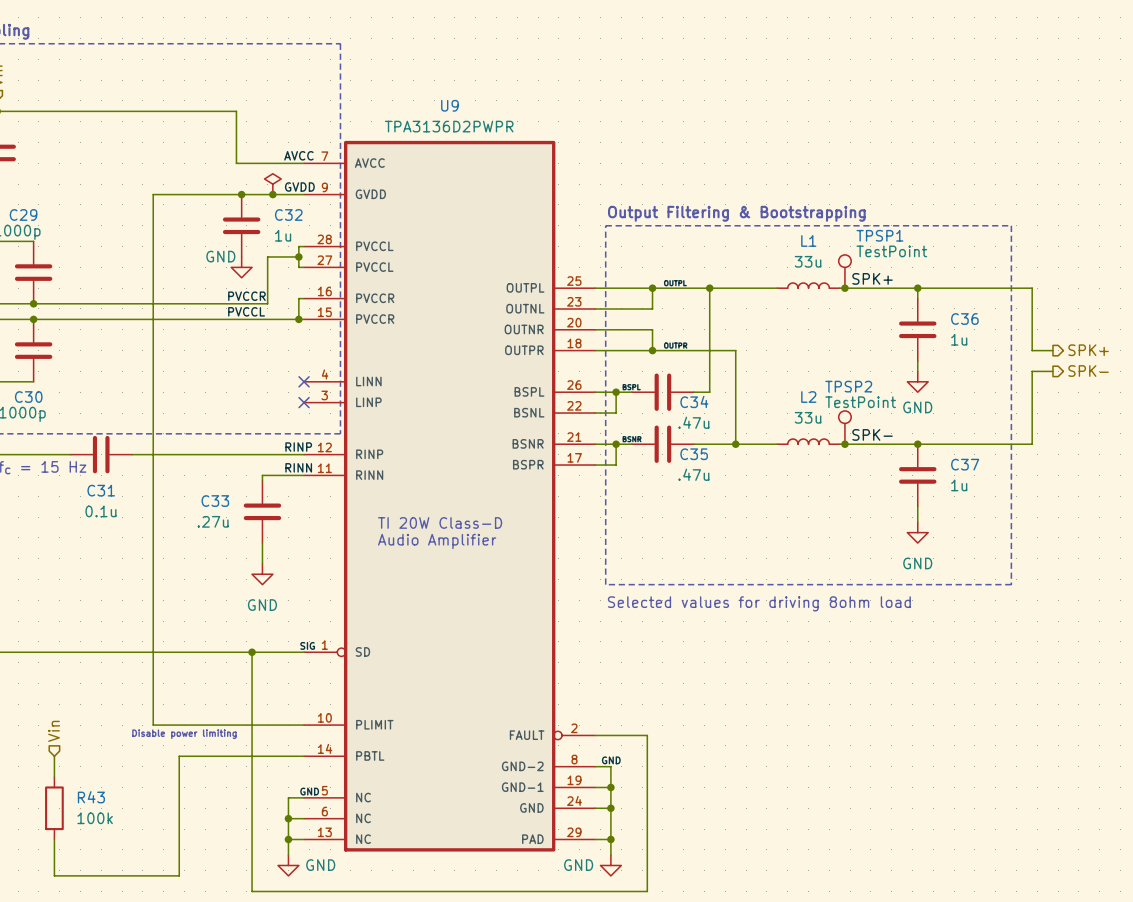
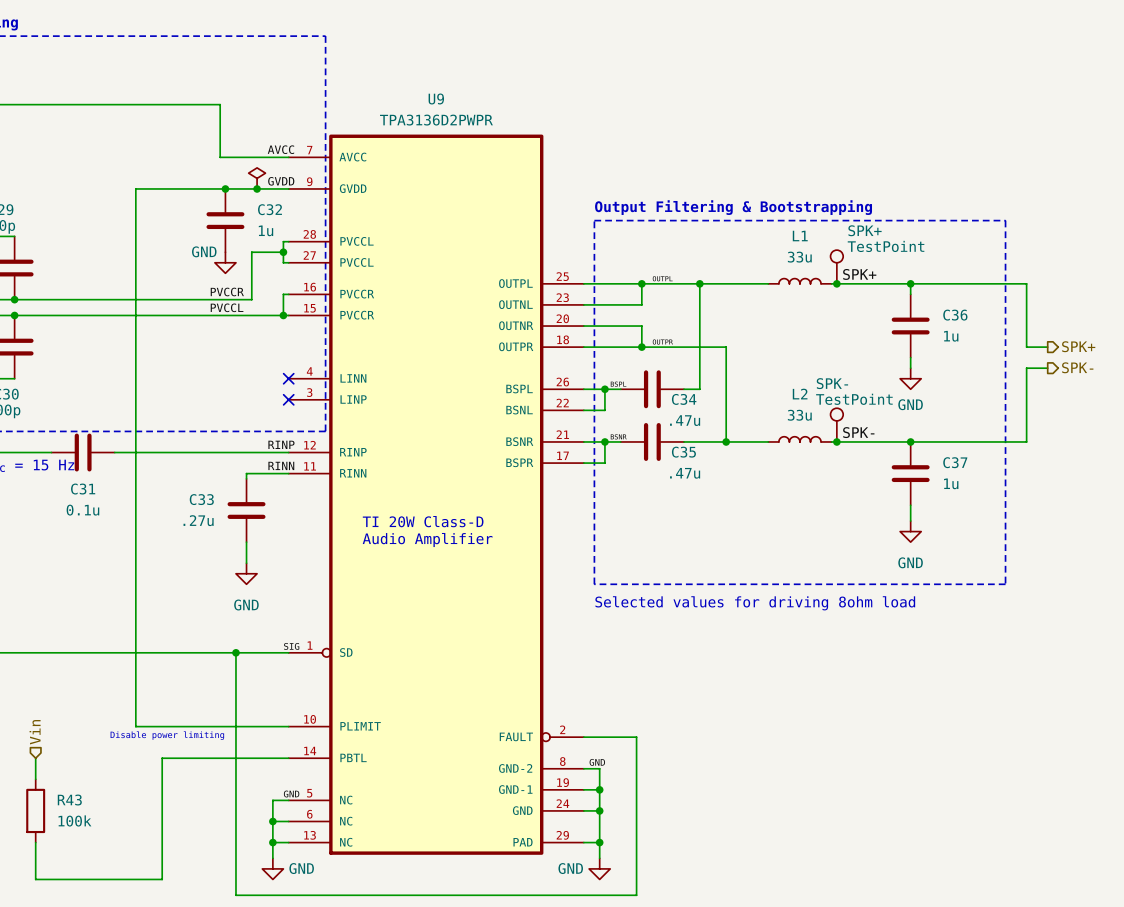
TPSP1 name: TPSP1 (879, 235) -> SPK+ (865, 230)
TPSP2 name: TPSP2 (848, 386) -> SPK- (832, 383)

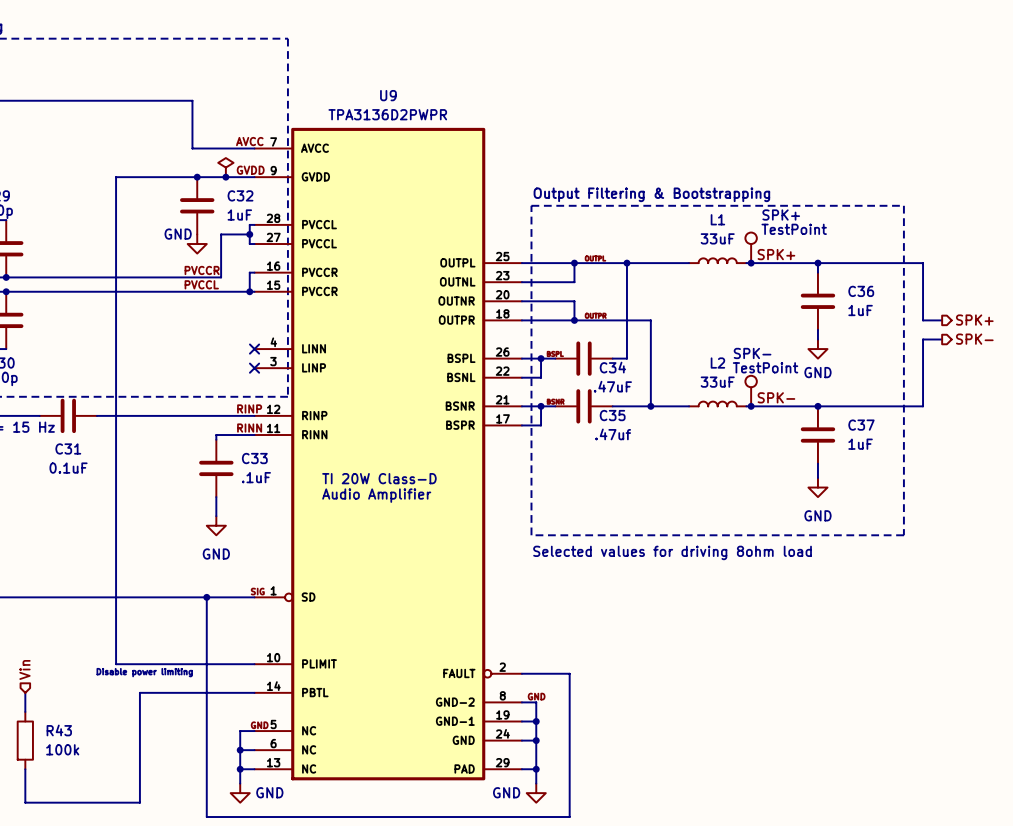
C32 value: 1u (266, 230) -> 1uF (239, 215)
L1 value: 33u (799, 257) -> 33uF (717, 238)
C36 value: 1u (951, 336) -> 1uF (860, 310)
L2 value: 33u (799, 415) -> 33uF (717, 382)
C34 value: .47u (685, 420) -> .47uF (612, 386)
C35 value: .47u (685, 473) -> .47uf (613, 434)
C37 value: 1u (951, 483) -> 1uF (860, 444)
C33 name position: C33 (201, 499) -> C33 (254, 458)
C31 value: 0.1u (82, 510) -> 0.1uF (68, 468)
C33 value: .27u (198, 520) -> .1uF (256, 477)

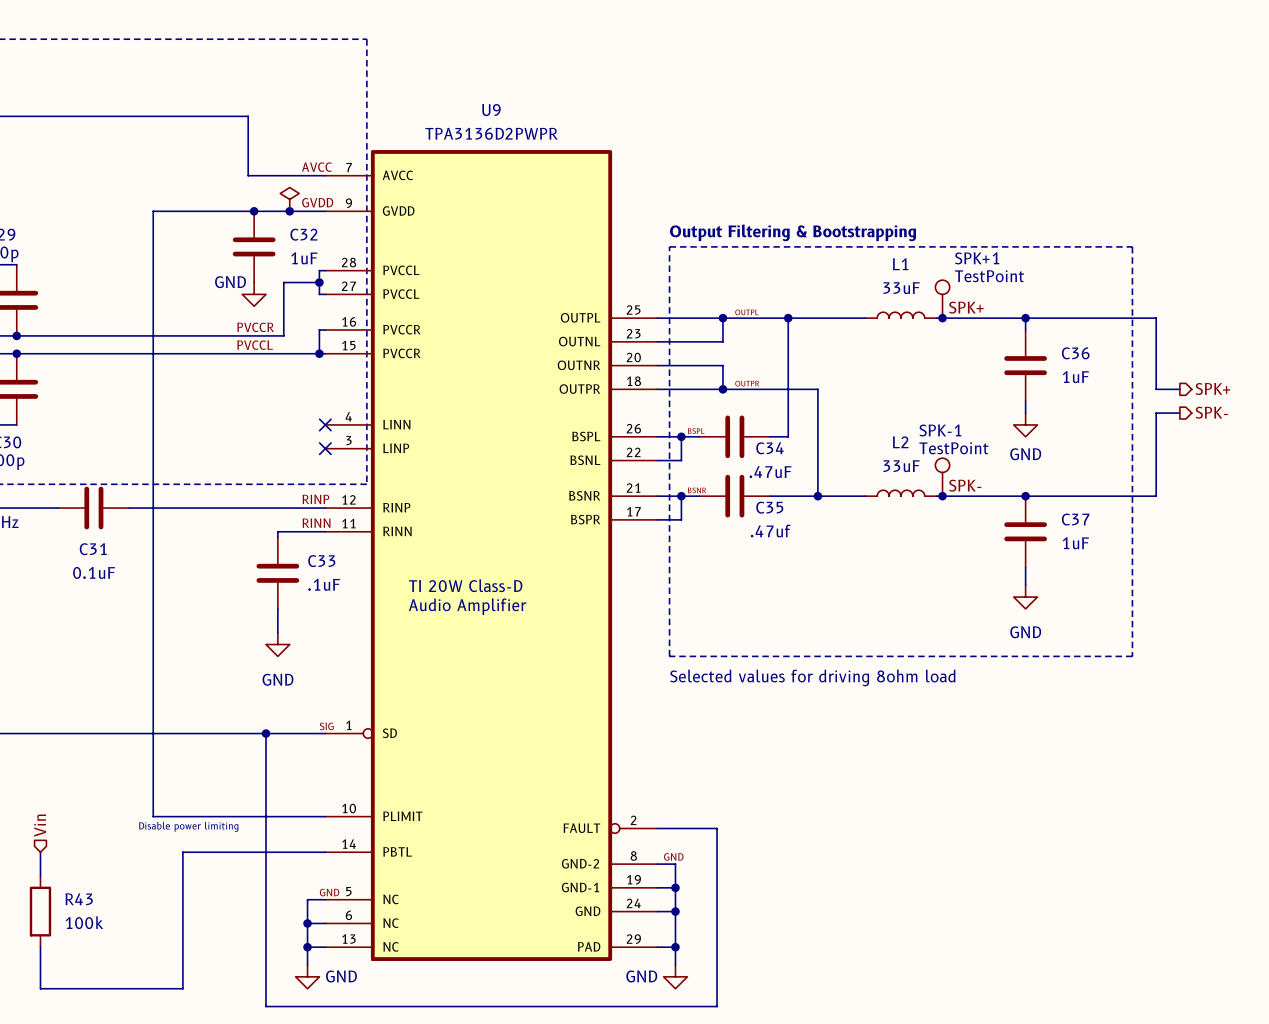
SPK+ name: SPK+ (781, 215) -> SPK+1 (977, 258)
SPK- name: SPK- (752, 353) -> SPK-1 (940, 430)

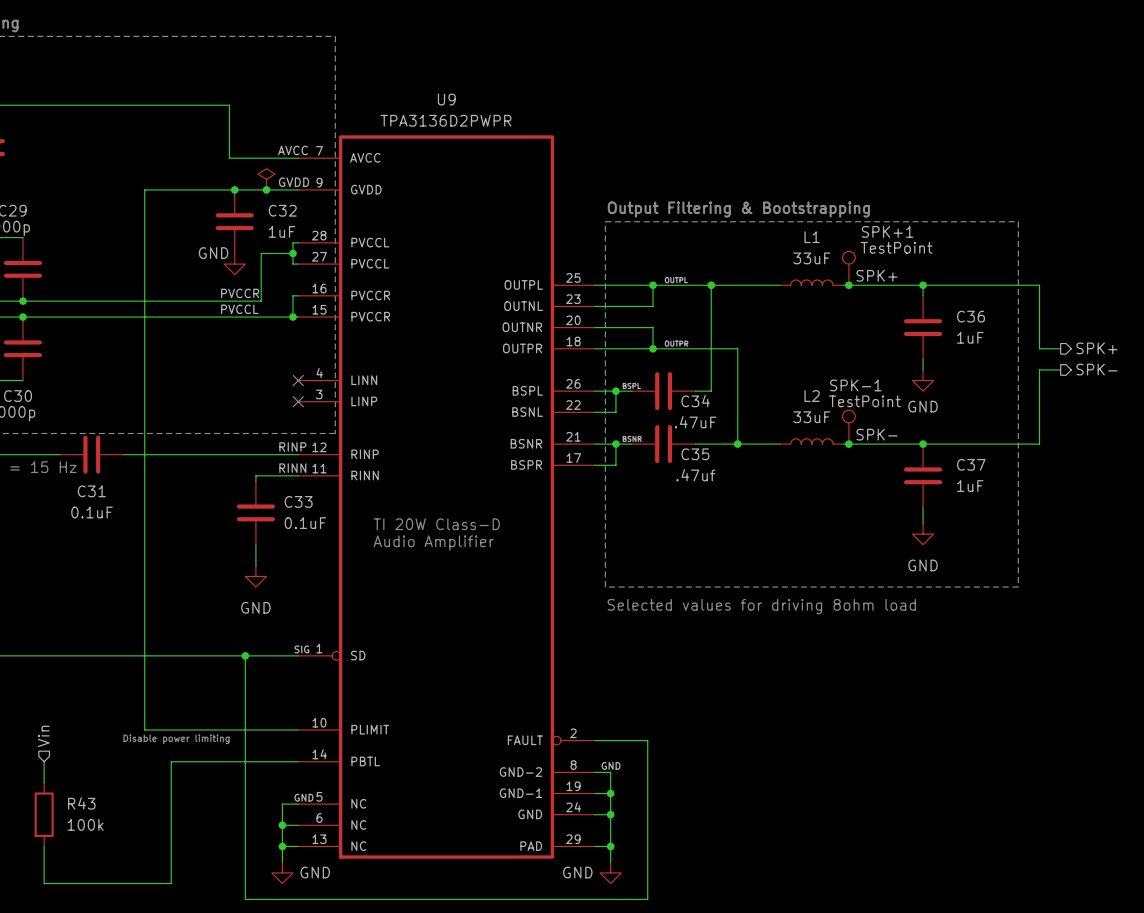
C33 value: .1uF (324, 584) -> 0.1uF (305, 523)

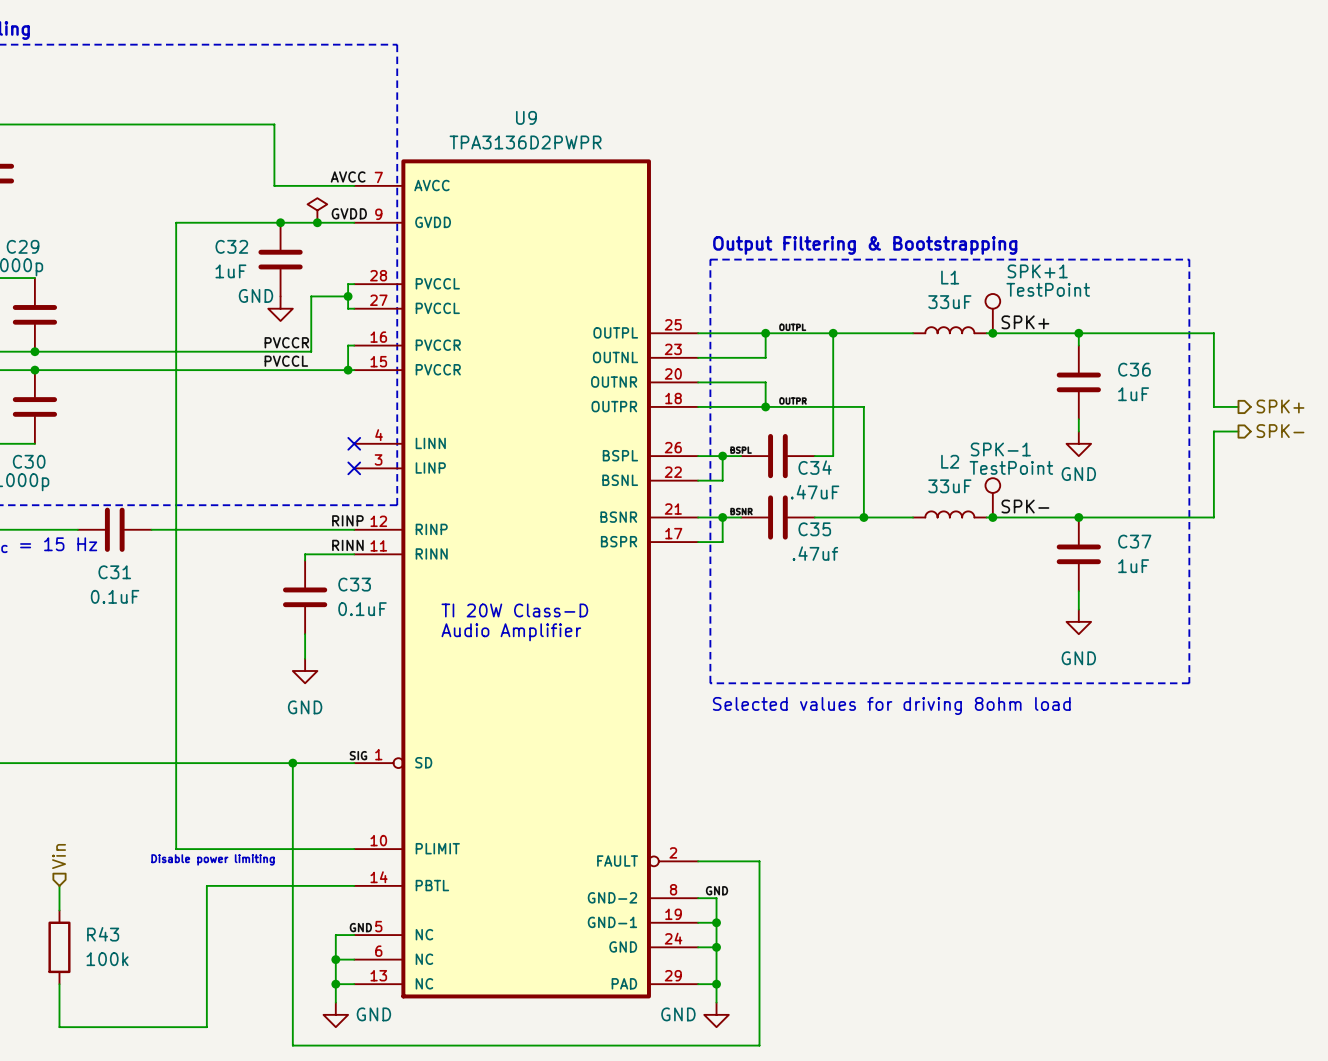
C32 name position: C32 (282, 210) -> C32 (231, 246)
C32 value position: 1uF (281, 231) -> 1uF (230, 271)

